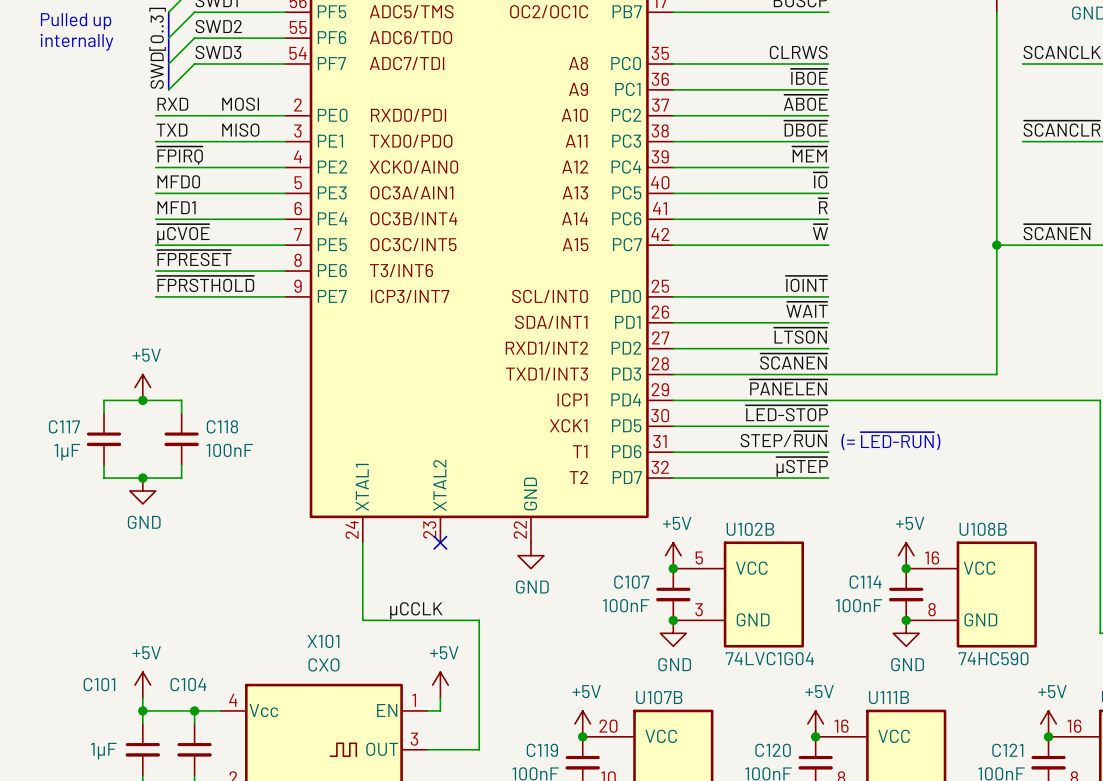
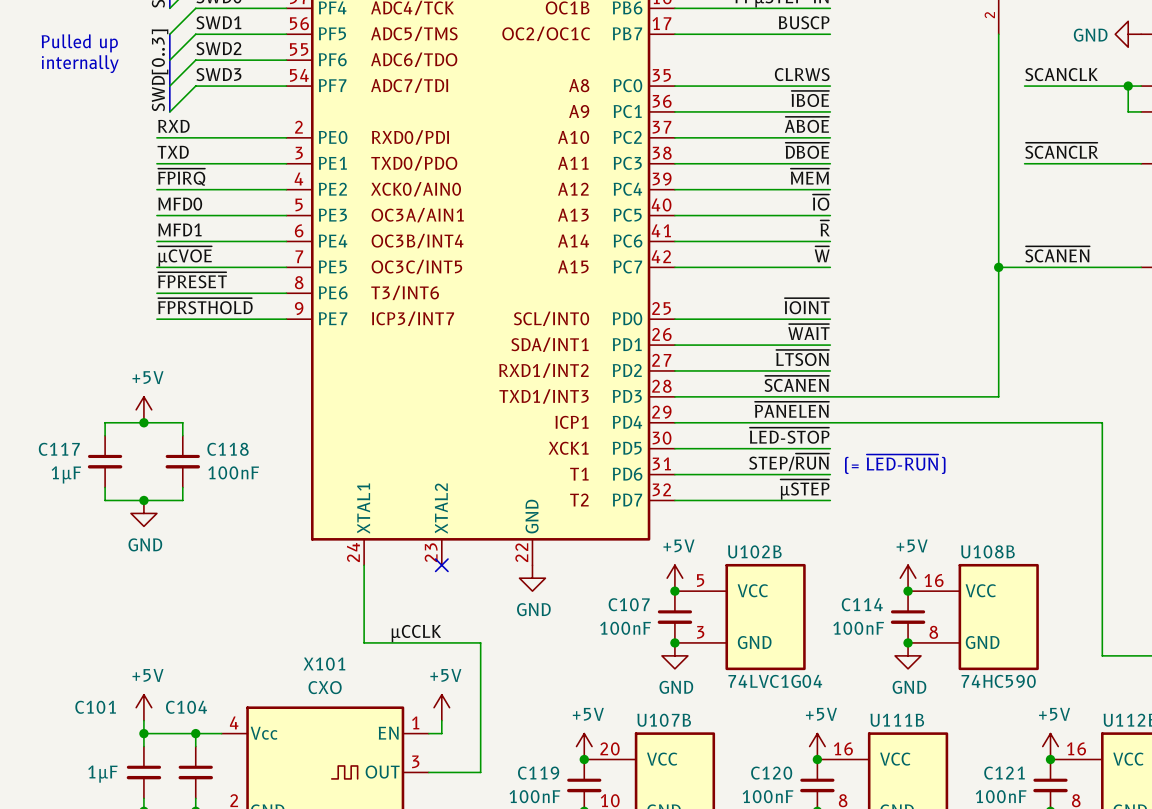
label: MOSI (240, 104) -> none
label: MISO (240, 130) -> none

